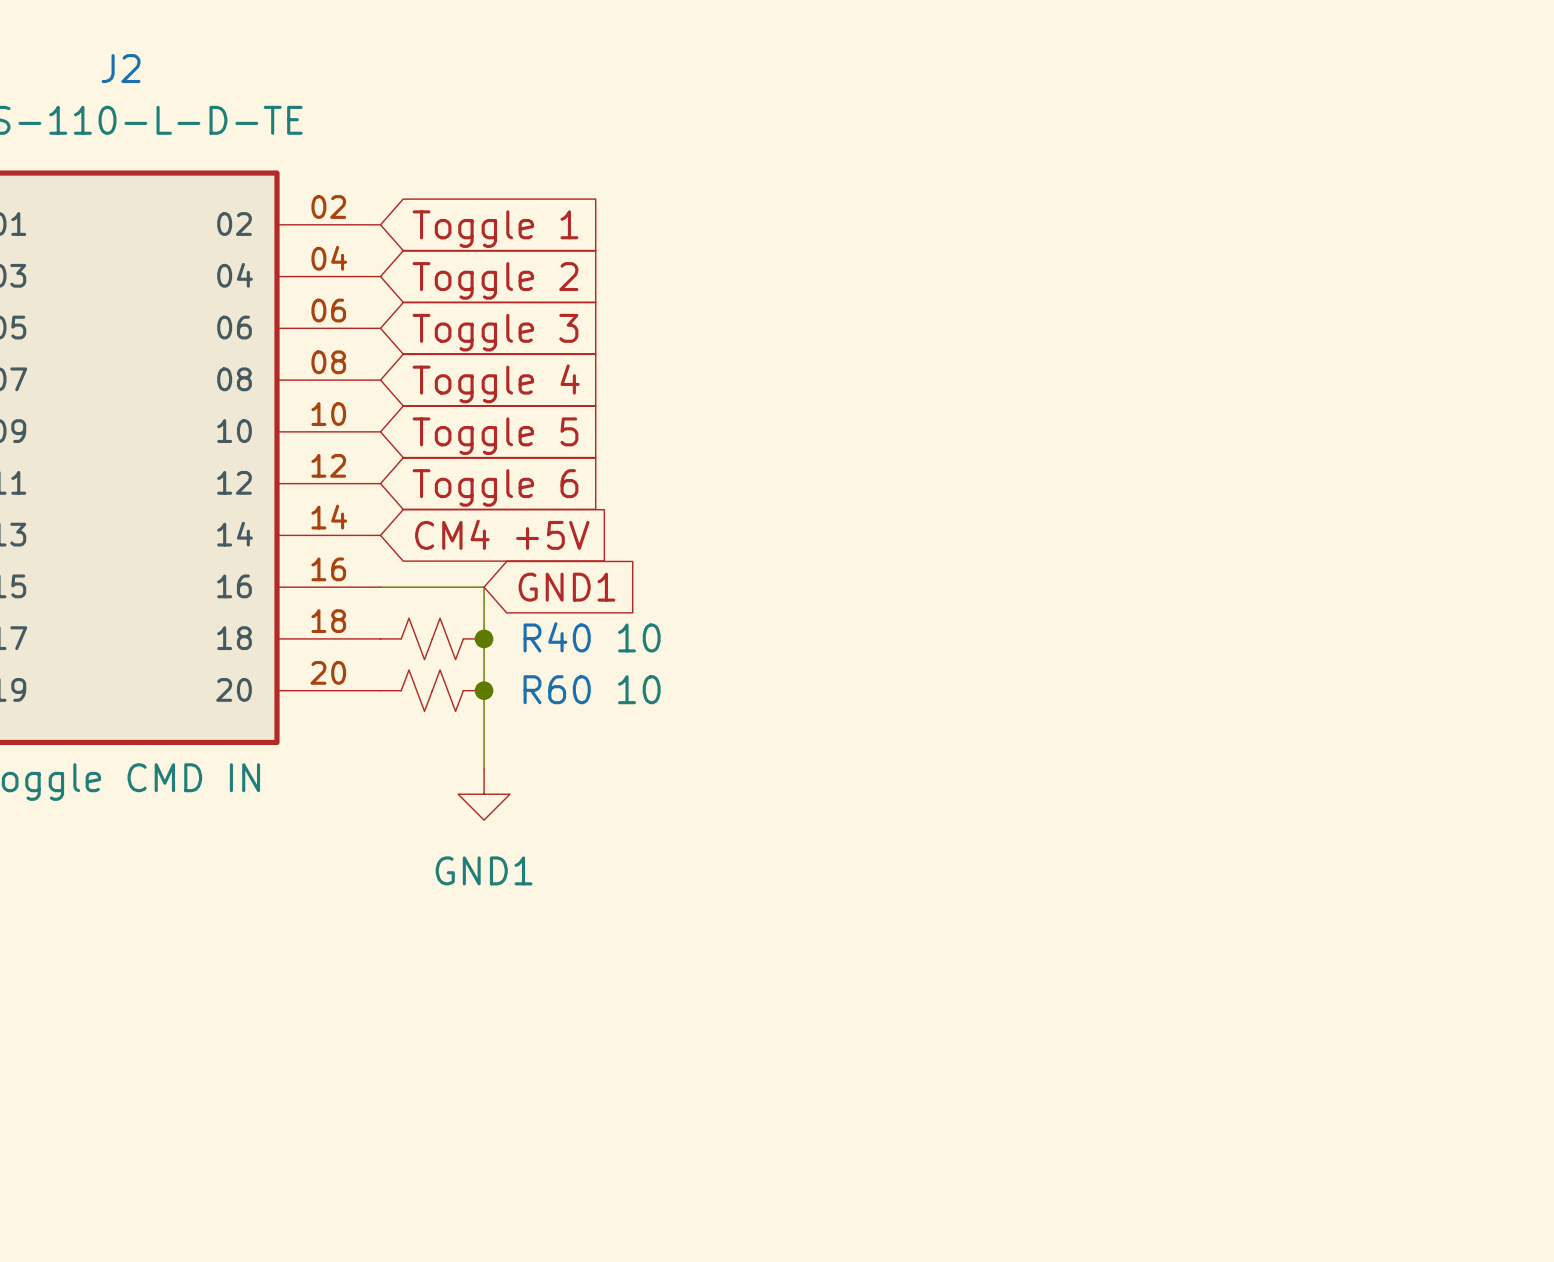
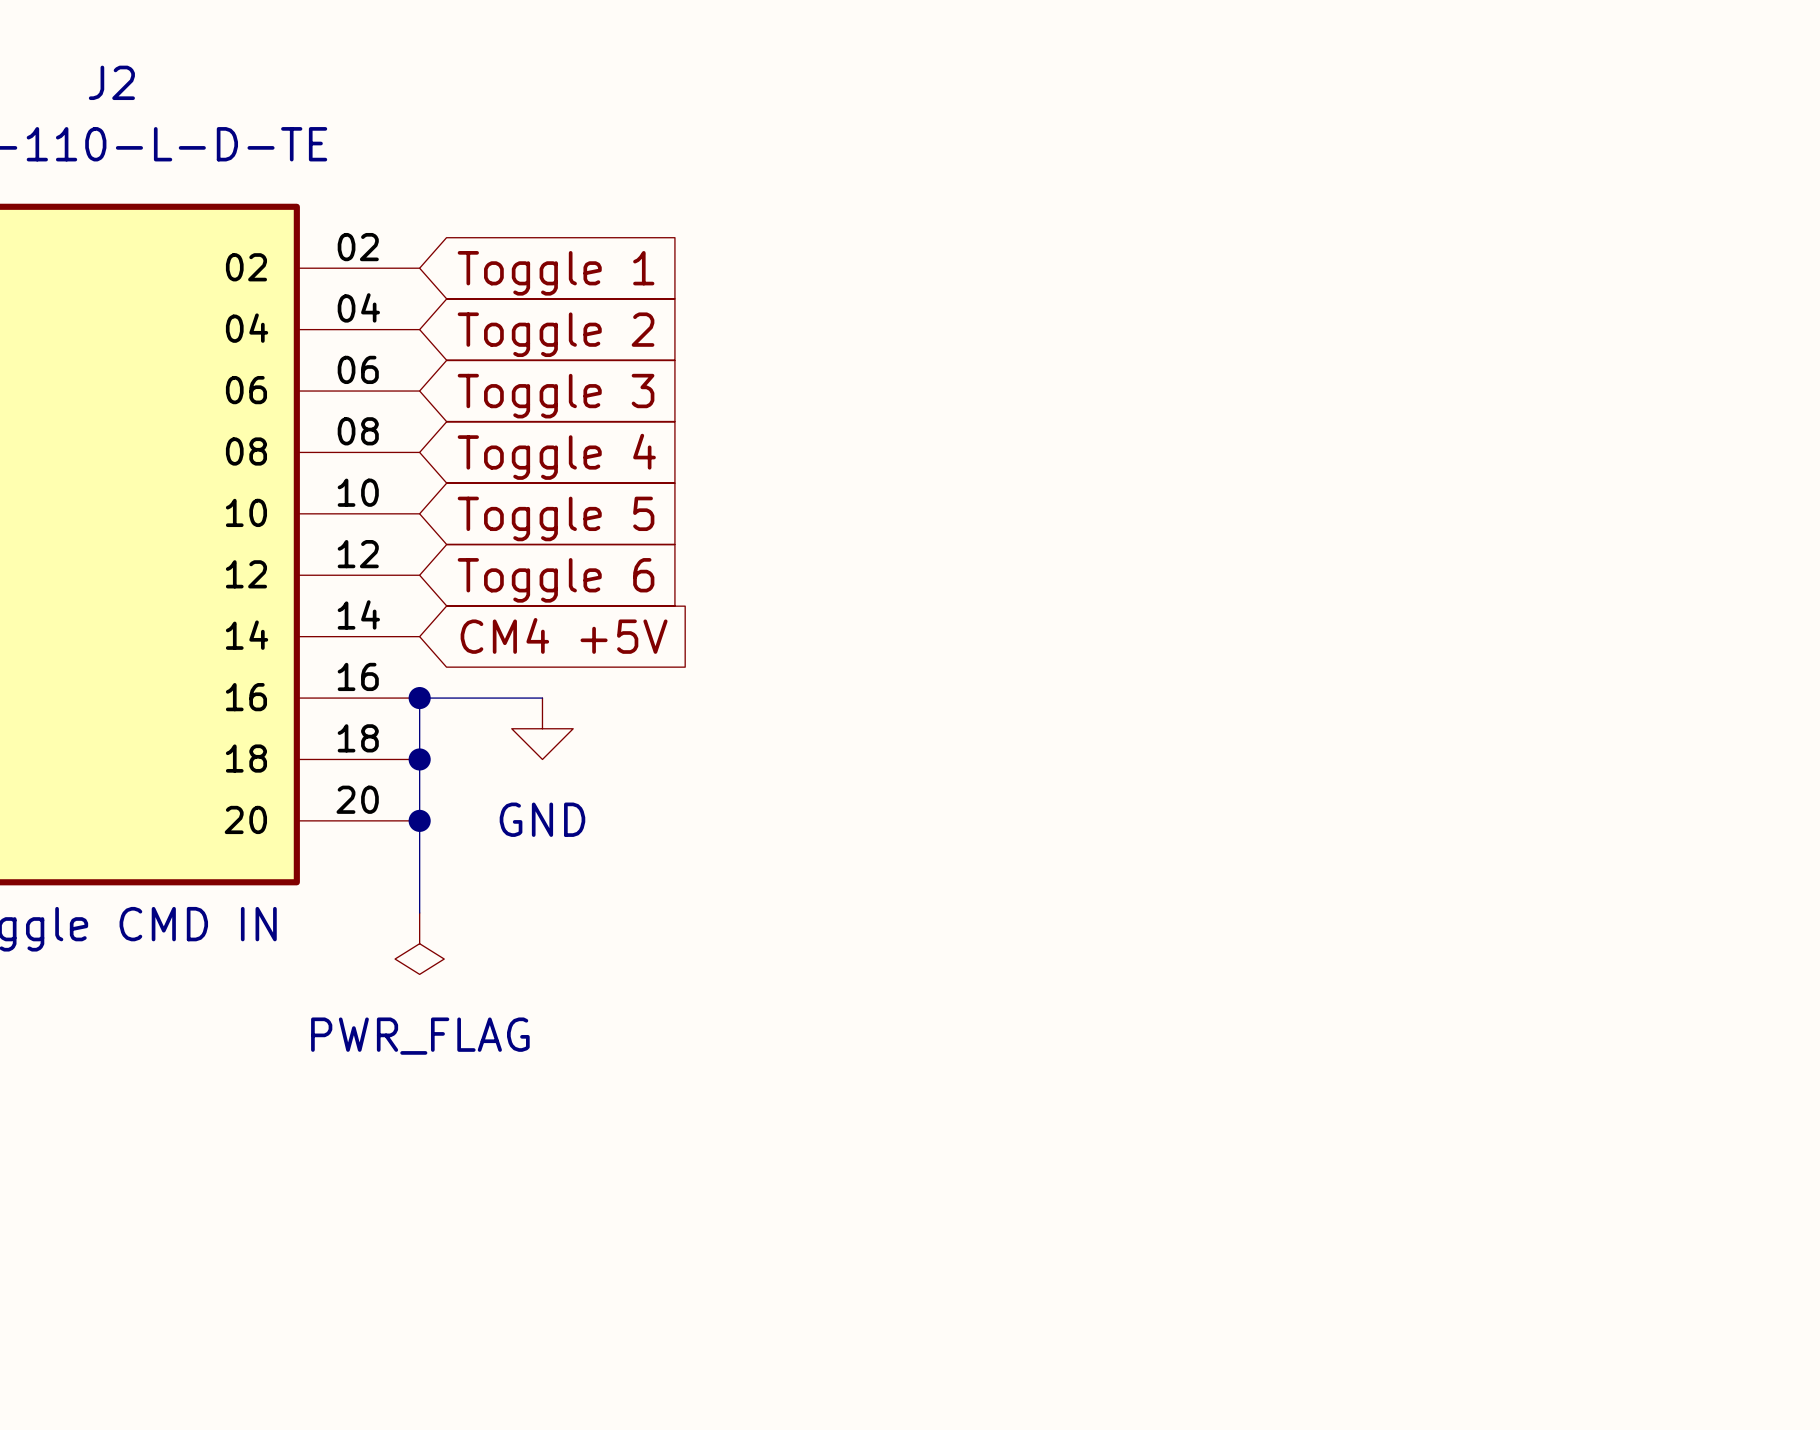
junction: none -> (419, 698)
wire: (484, 587) (484, 768) -> (419, 698) (419, 912)
global label: GND1 (566, 587) -> none
power symbol: none -> GND (542, 728)
junction: none -> (419, 759)
R40: 10 (432, 638) -> none
junction: (484, 638) -> none
junction: none -> (419, 820)
R60: 10 (432, 690) -> none
junction: (484, 690) -> none
power symbol: none -> PWR_FLAG (419, 943)
power symbol: GND1 (484, 794) -> none

